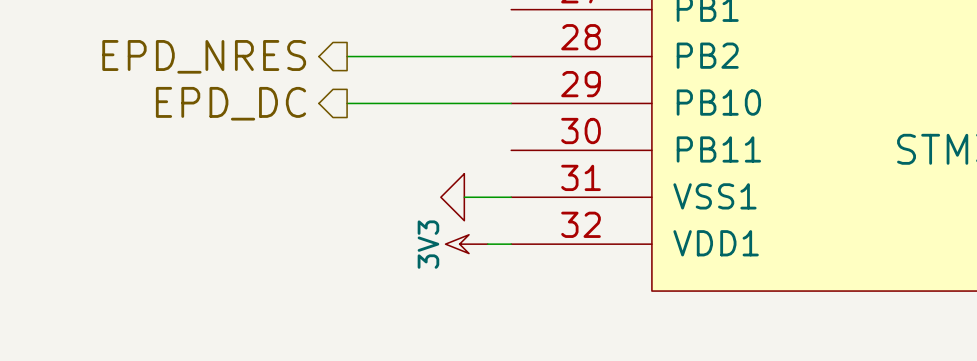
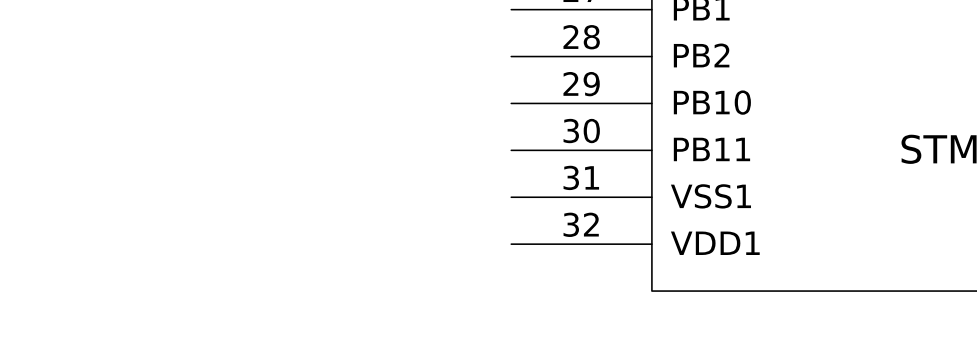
hierarchical label: EPD_NRES (204, 56) -> none
wire: (347, 56) (511, 56) -> none
hierarchical label: EPD_DC (230, 103) -> none
wire: (347, 103) (511, 103) -> none
power symbol: (452, 197) -> none
wire: (464, 197) (511, 197) -> none
power symbol: 3V3 (466, 244) -> none
wire: (487, 244) (511, 244) -> none

